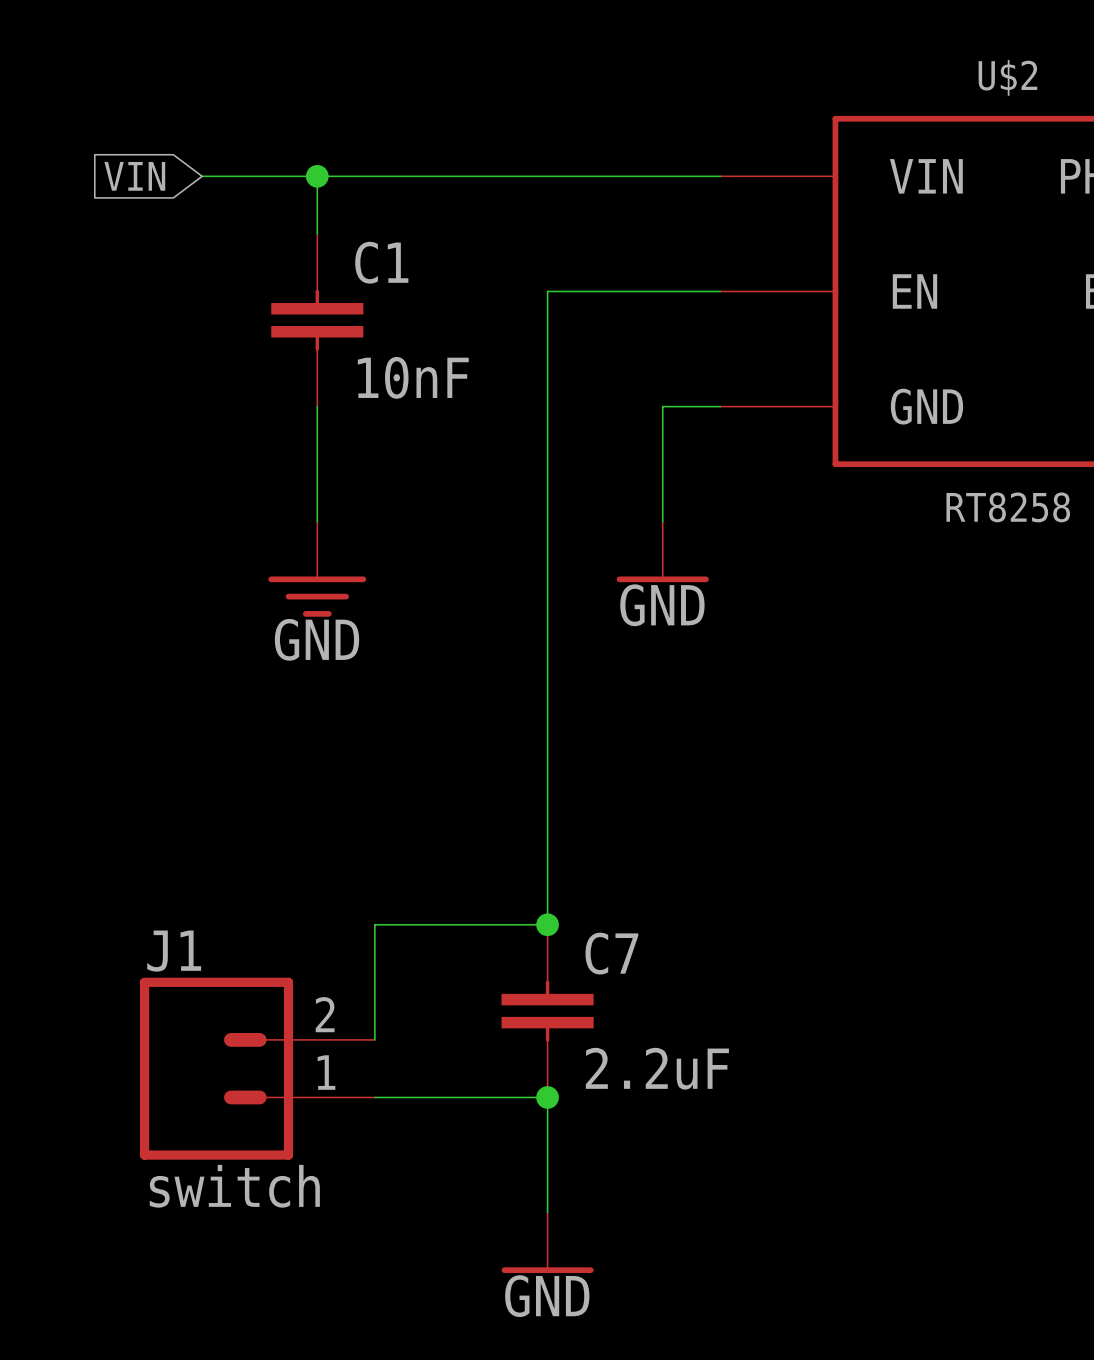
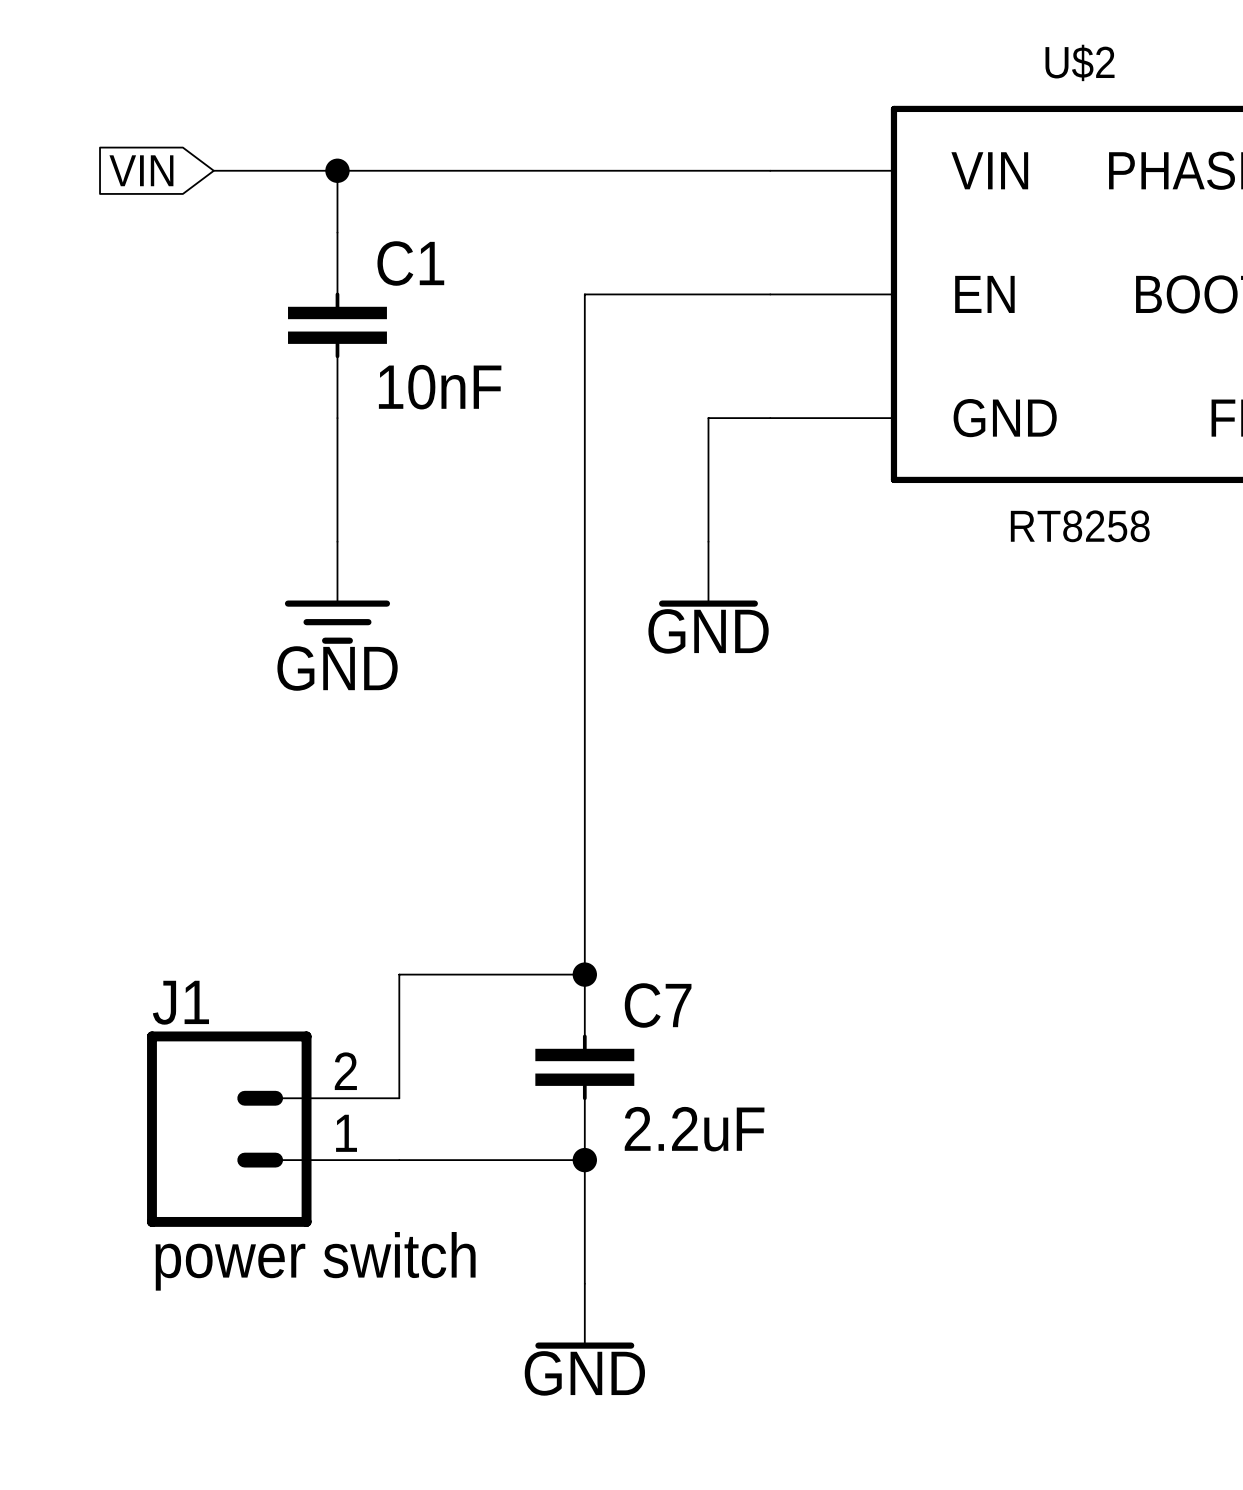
J1 value: switch (234, 1186) -> power switch (315, 1261)

